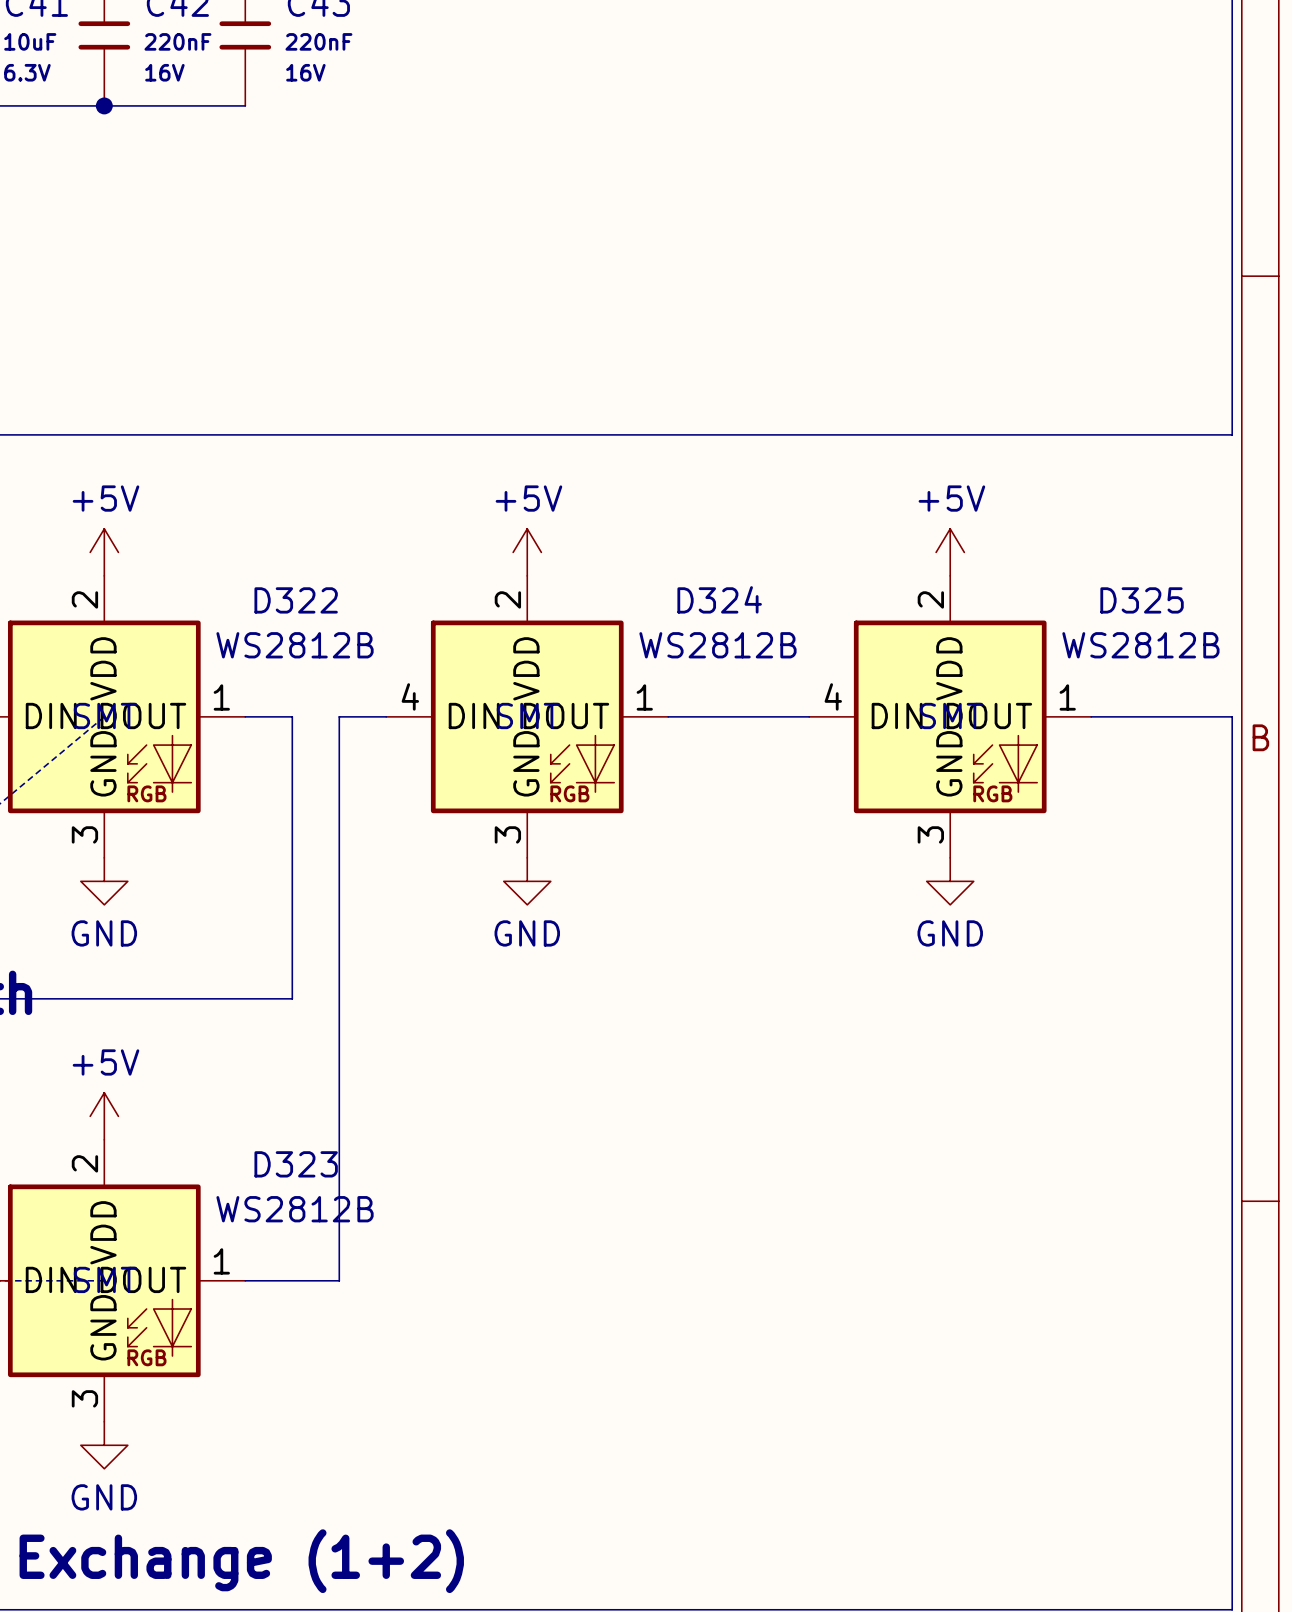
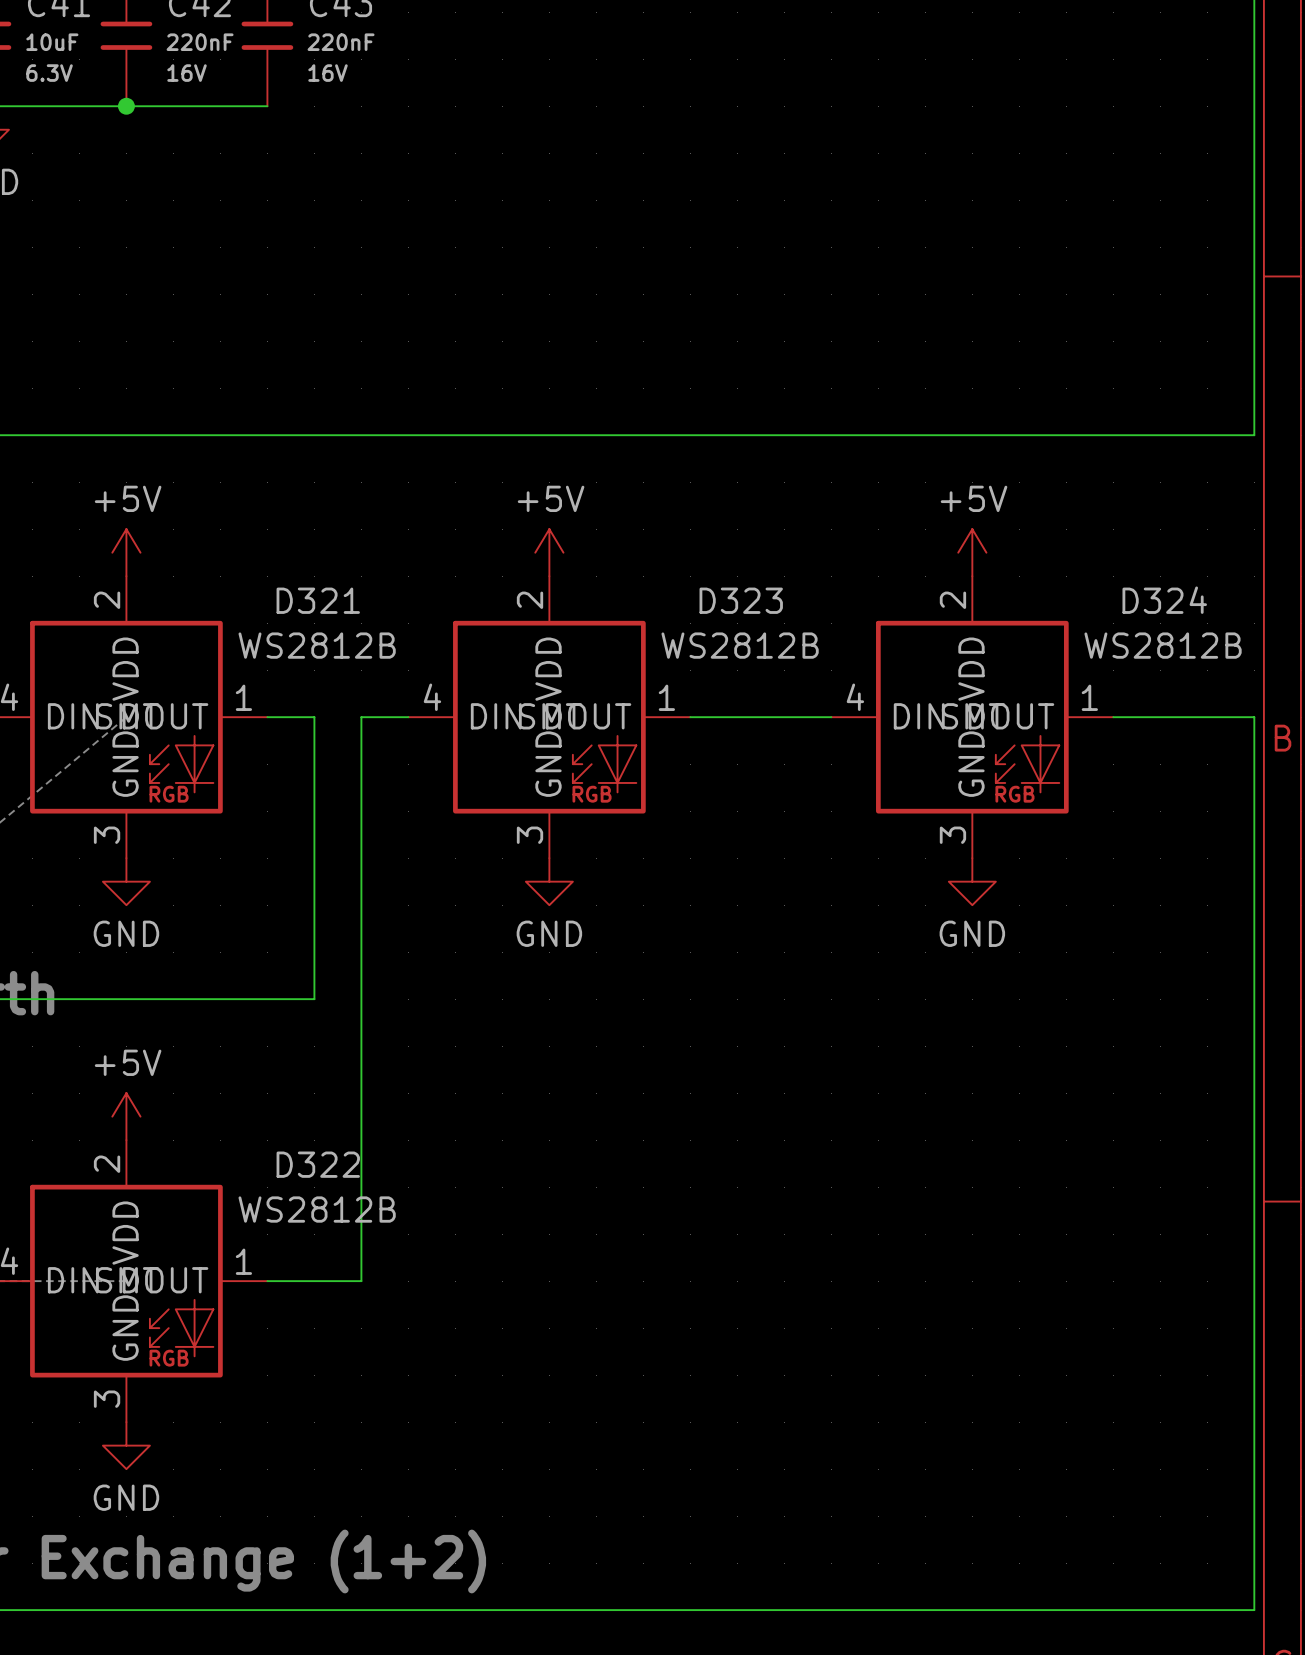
D324 name: D324 (719, 599) -> D323 (741, 600)
D322 name: D322 (296, 600) -> D321 (318, 600)
D325 name: D325 (1142, 600) -> D324 (1164, 600)
D323 name: D323 (296, 1164) -> D322 (318, 1164)

